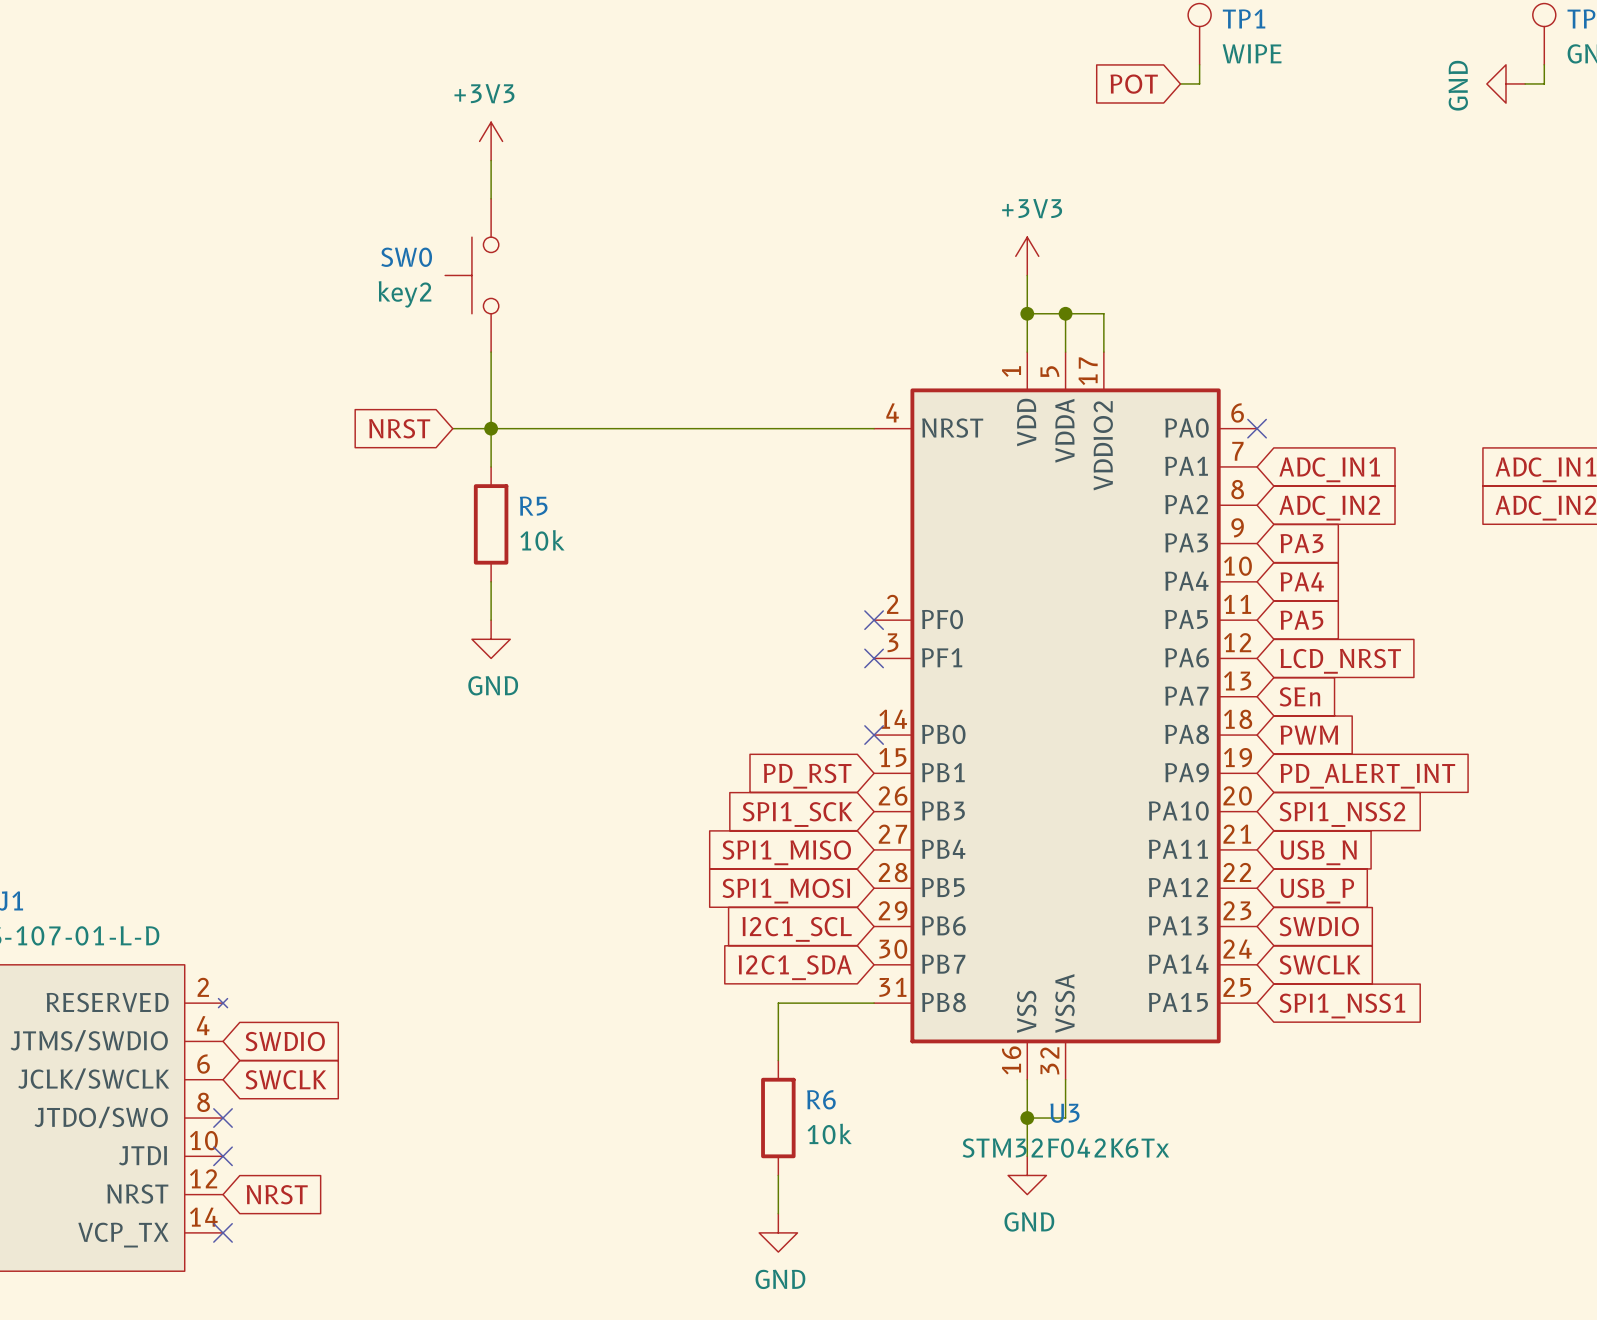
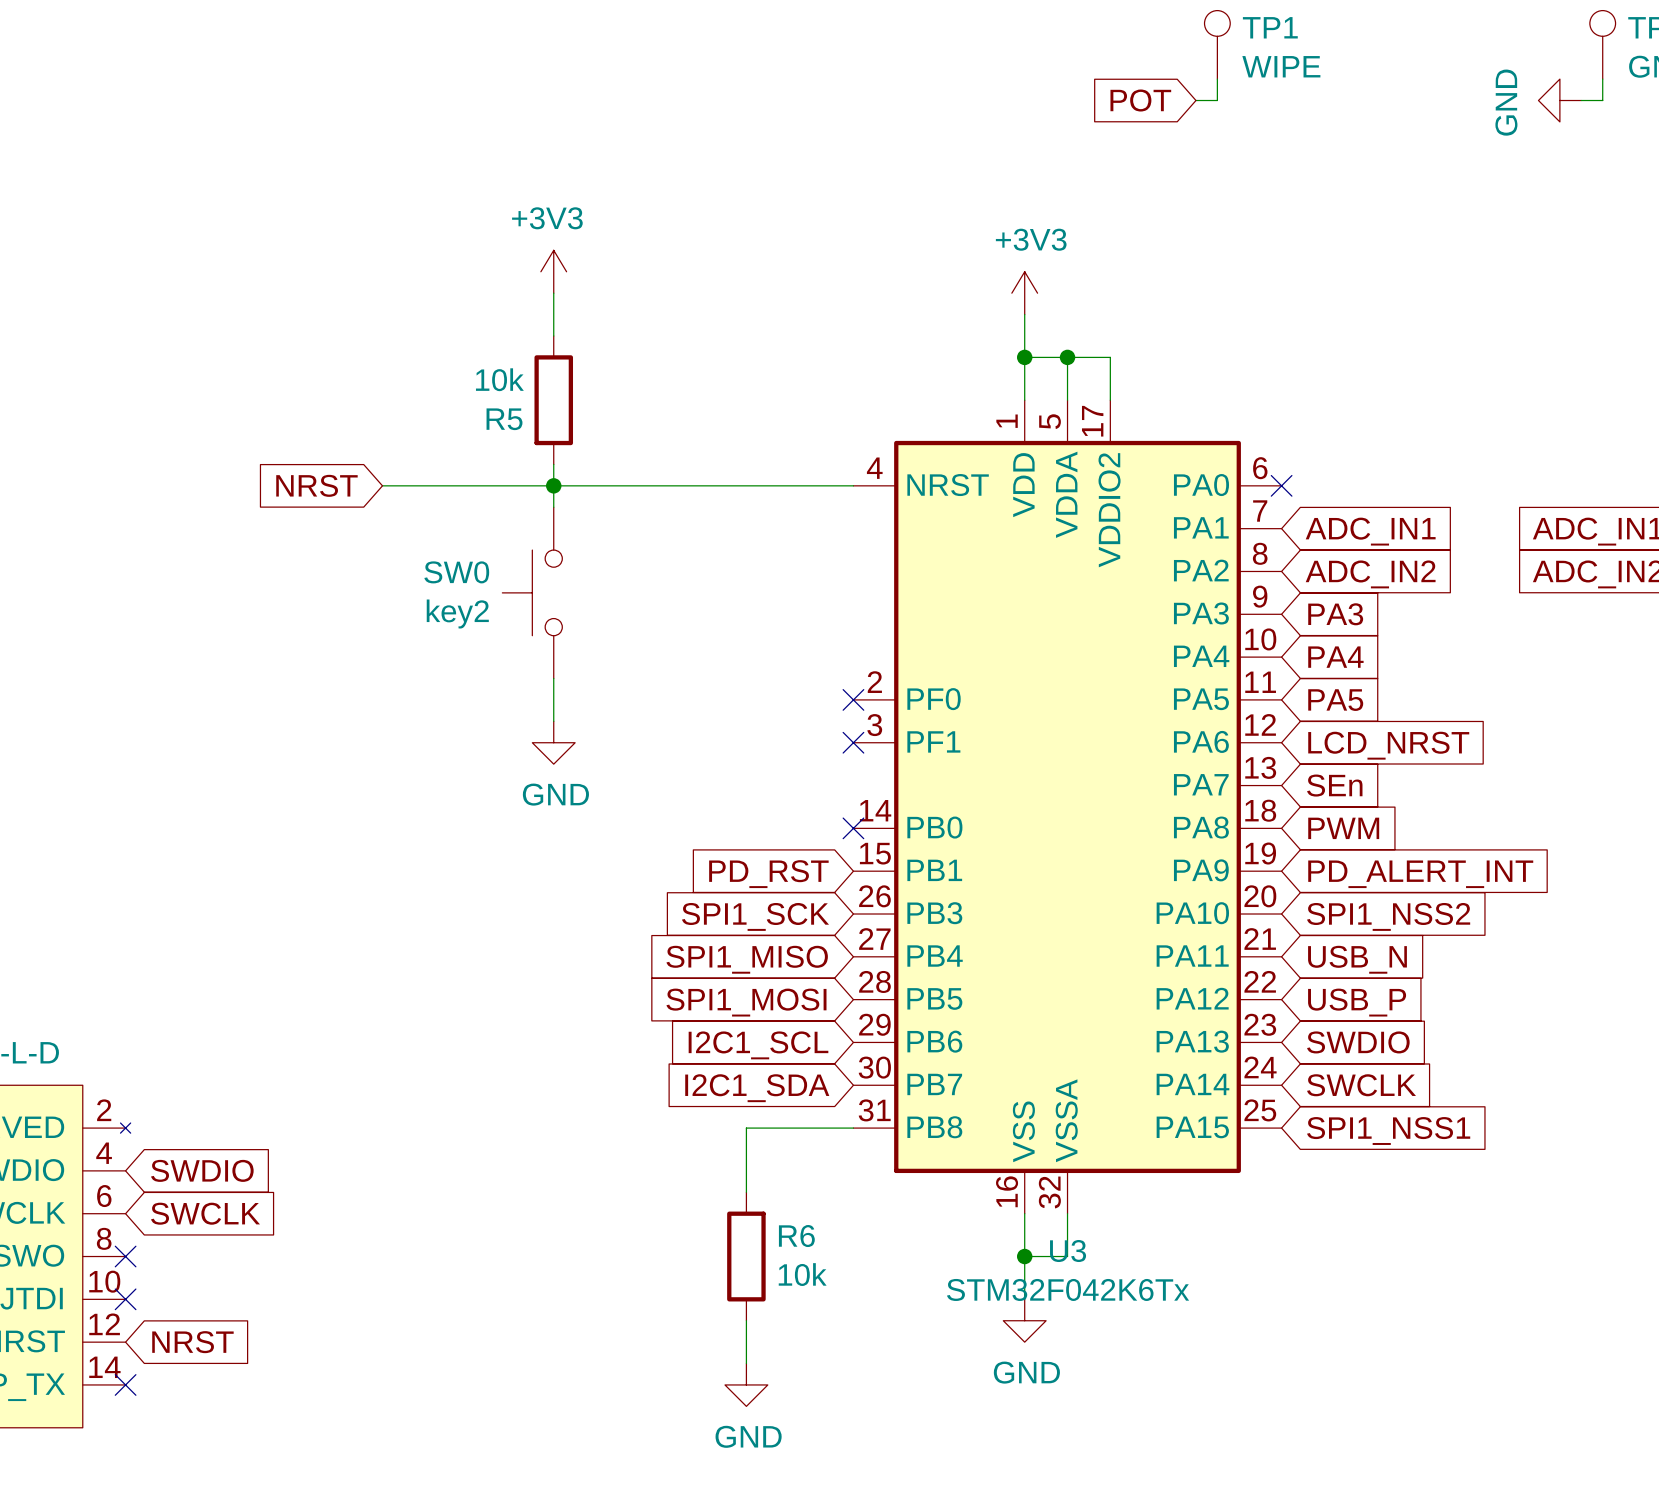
power symbol position: +3V3 (491, 141) -> +3V3 (553, 271)
wire: (491, 160) (491, 198) -> (553, 293) (553, 335)
SW0 position: (471, 275) -> (532, 592)
wire: (491, 352) (491, 466) -> none
wire: none -> (553, 464) (553, 507)
junction: (491, 428) -> none
junction: none -> (553, 485)
R5 name position: R5 (533, 506) -> R5 (504, 419)
R5 position: (491, 524) -> (553, 400)
R5 value position: 10k (542, 540) -> 10k (499, 379)
wire: (491, 581) (491, 620) -> (553, 678) (553, 721)
power symbol position: GND (491, 639) -> GND (553, 742)

